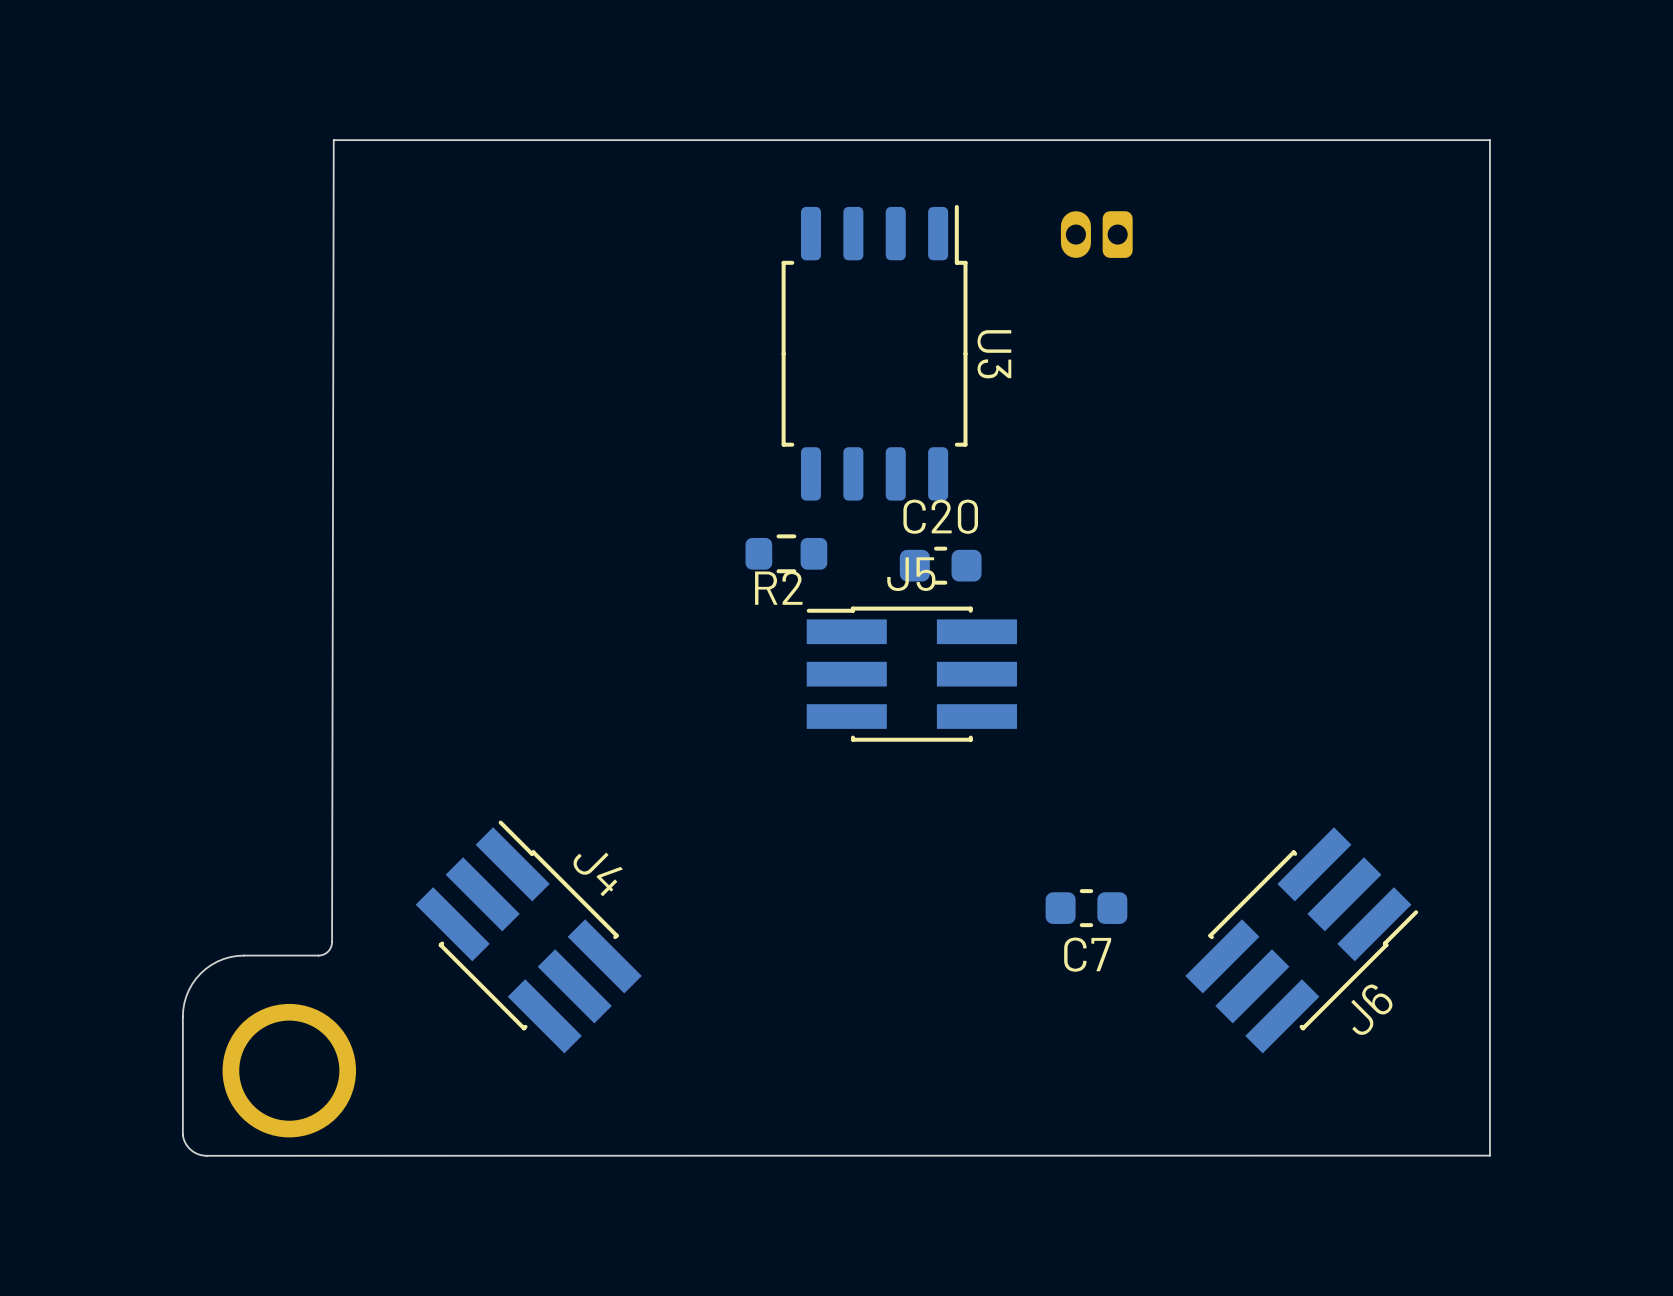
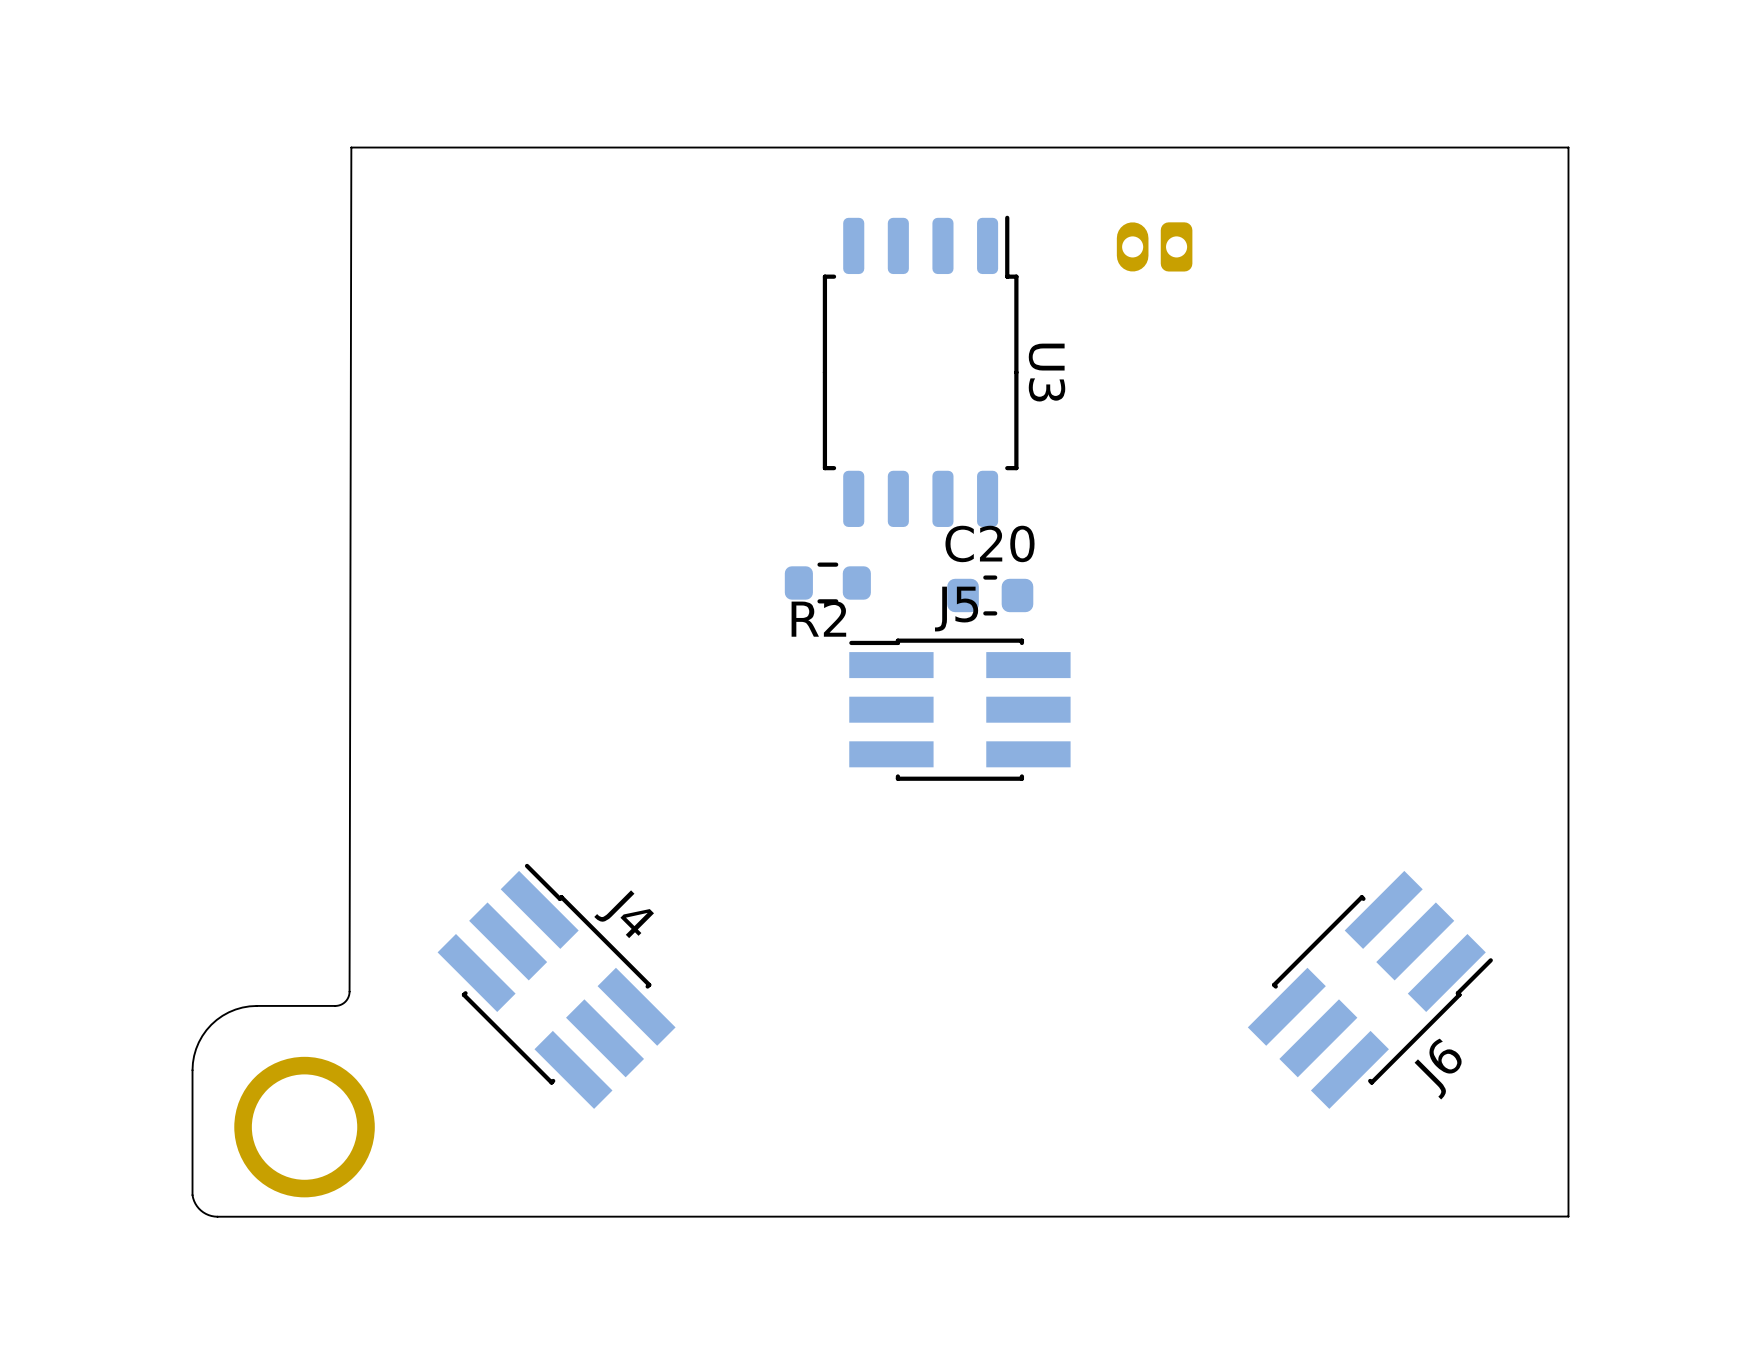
C7: (1086, 908) -> none

